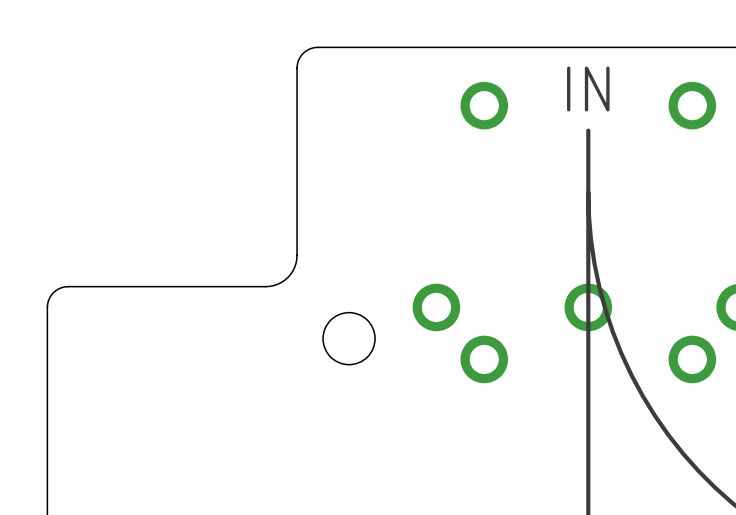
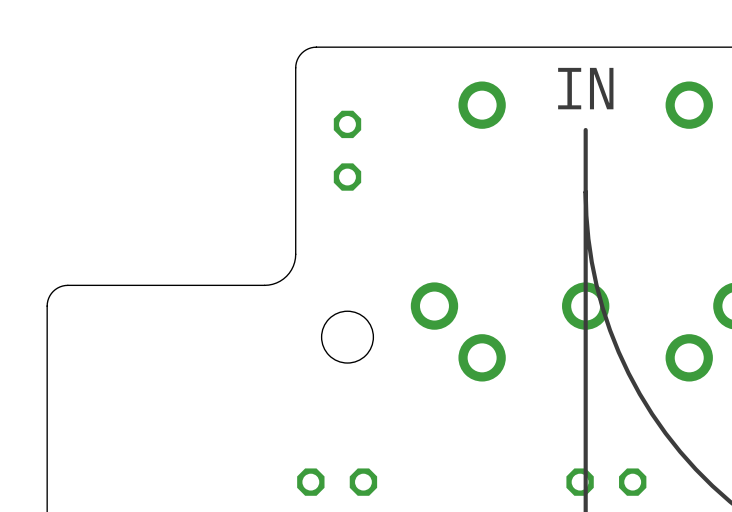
part: none -> (347, 150)
part: none -> (337, 482)
part: none -> (606, 482)

